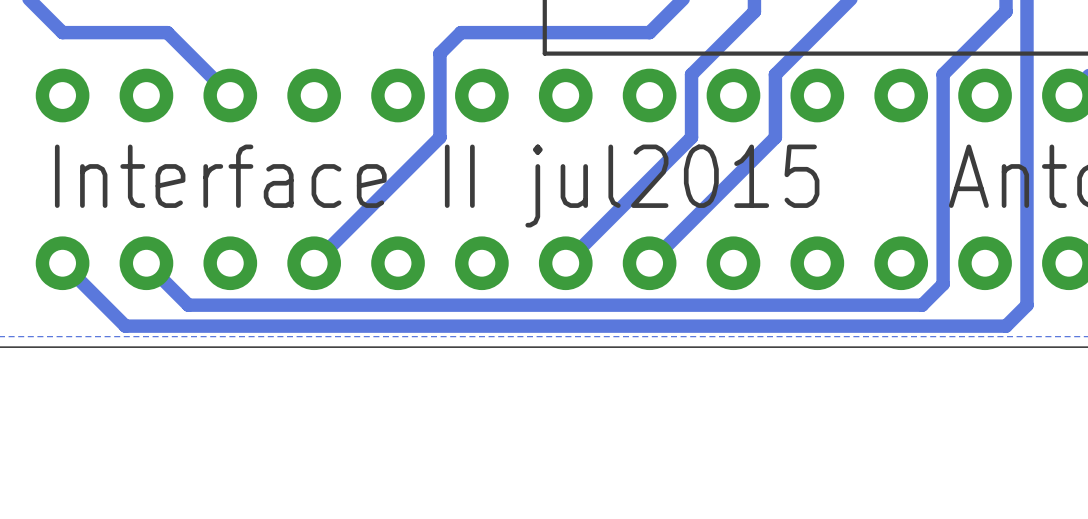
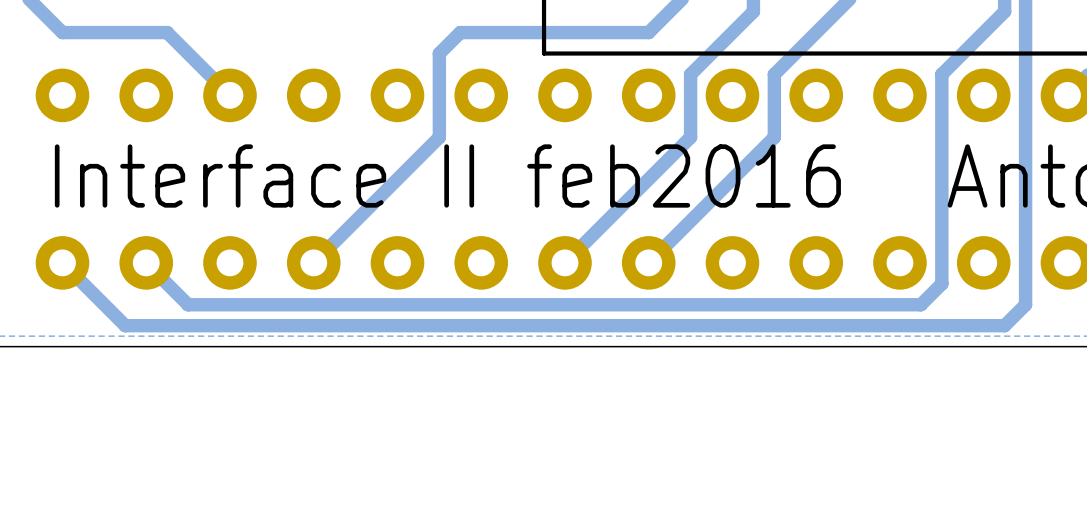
text: Interface II jul2015 (437, 186) -> Interface II feb2016 (447, 176)

